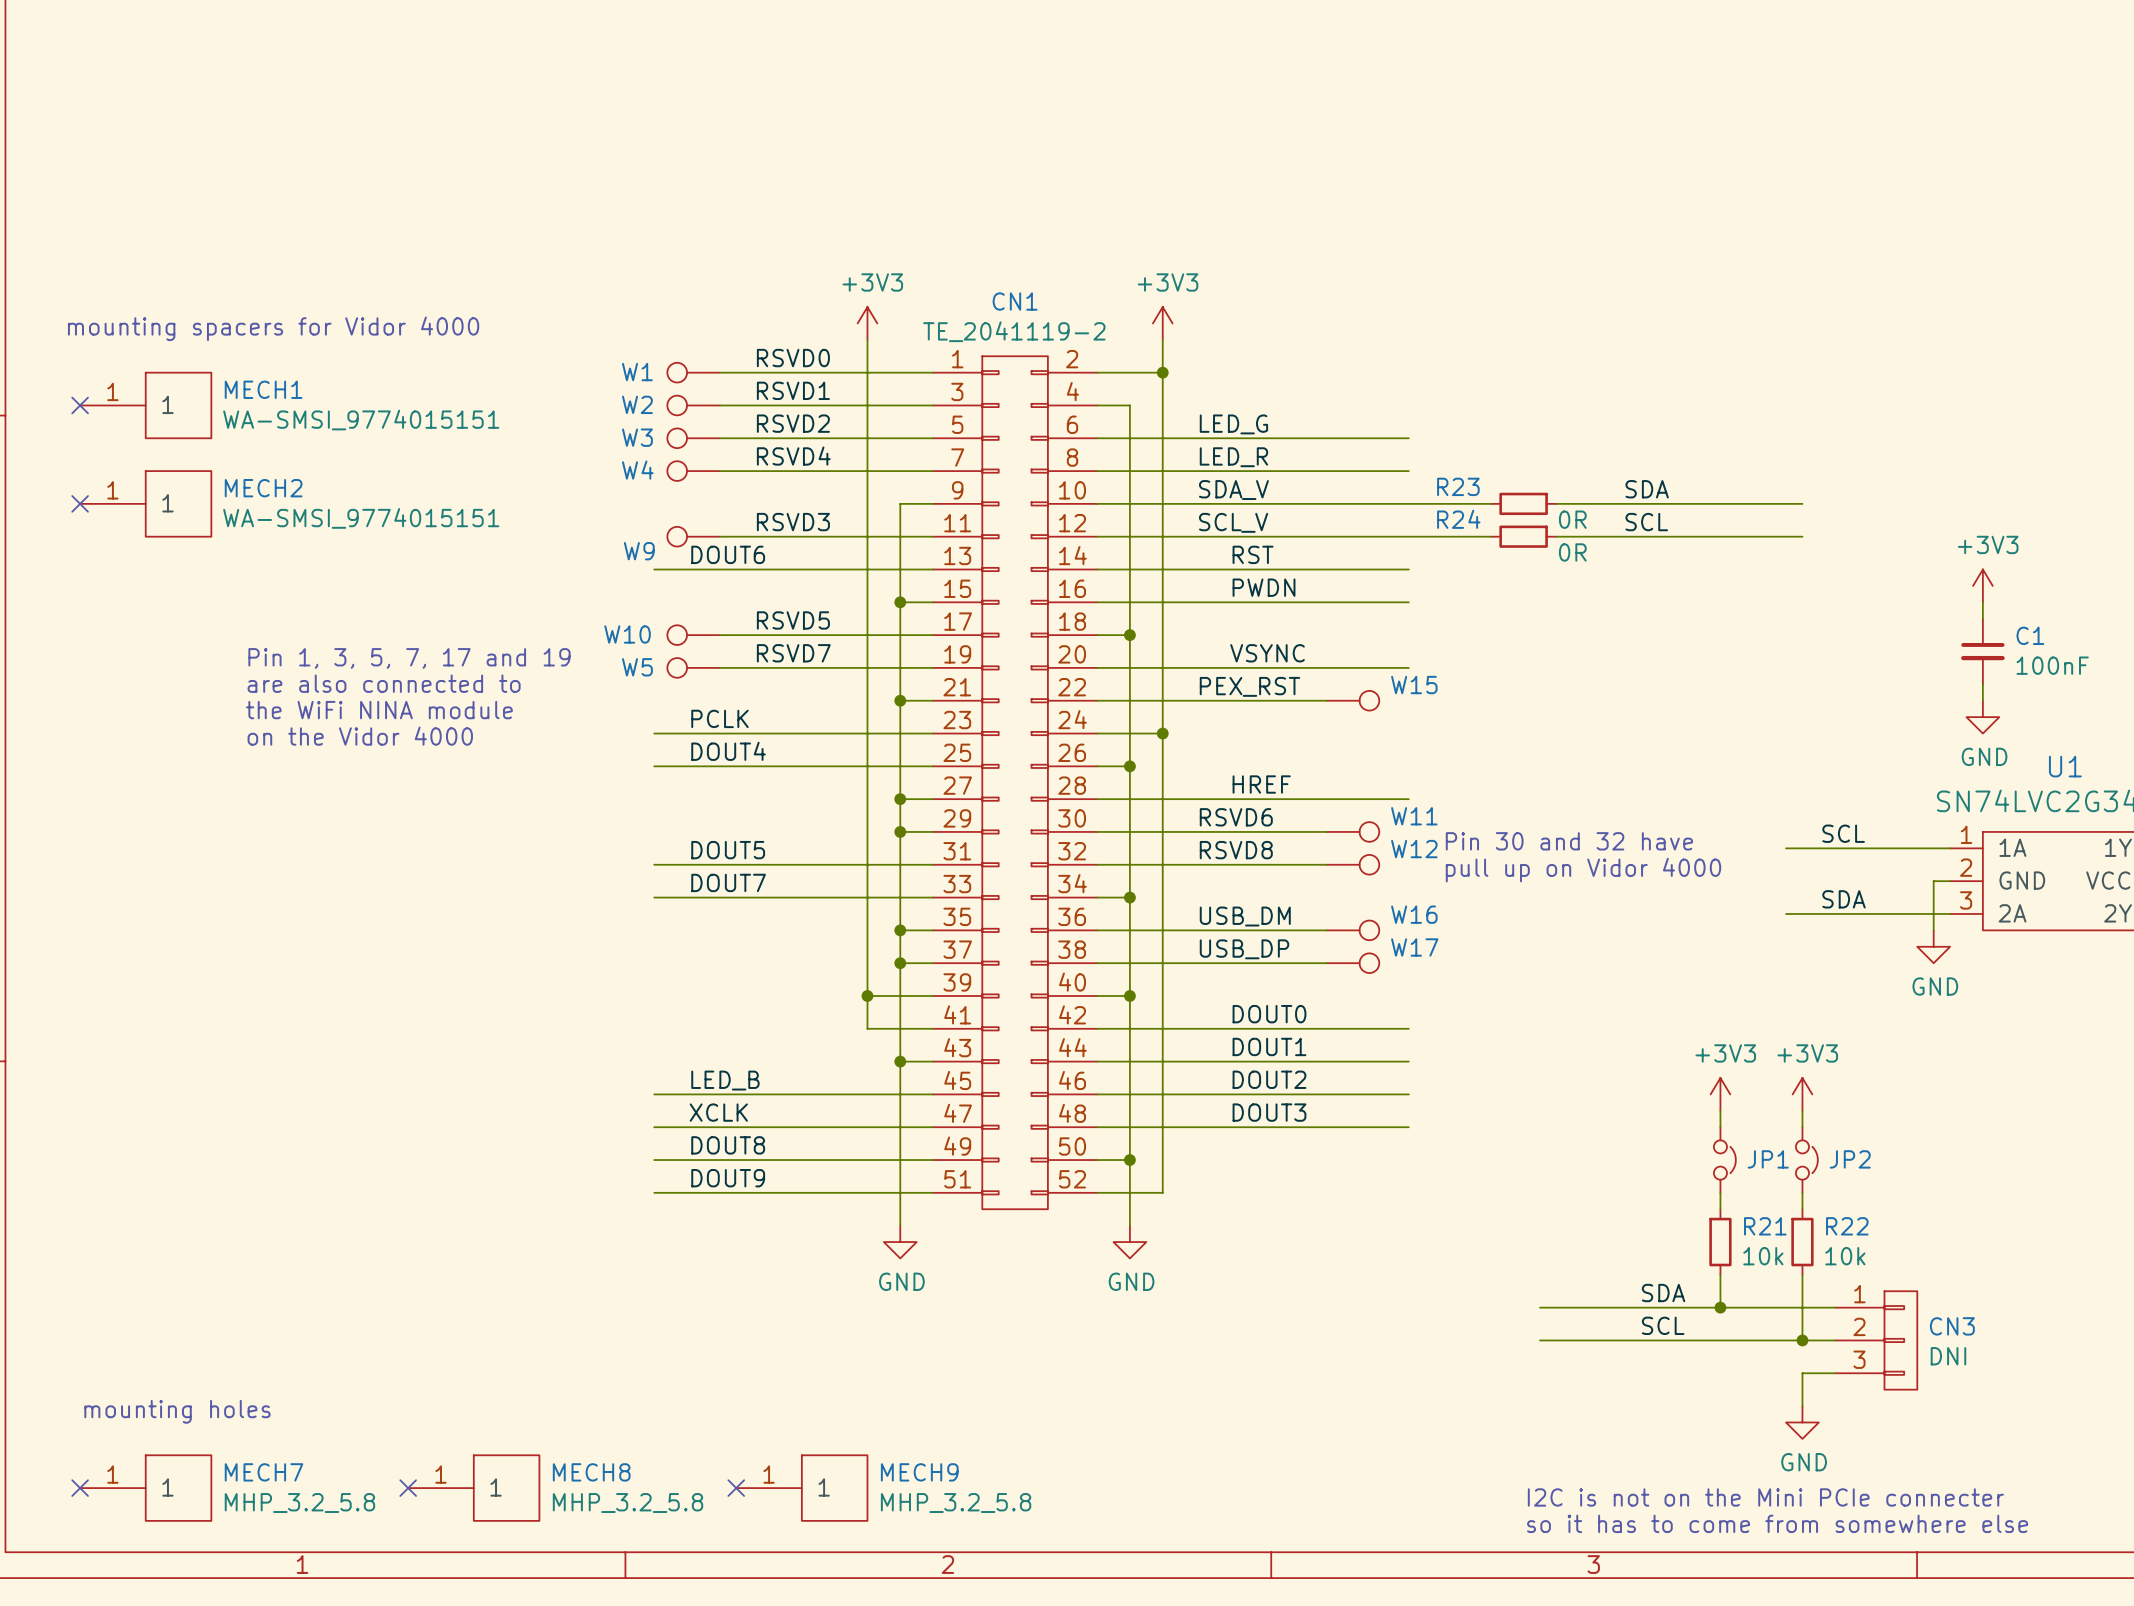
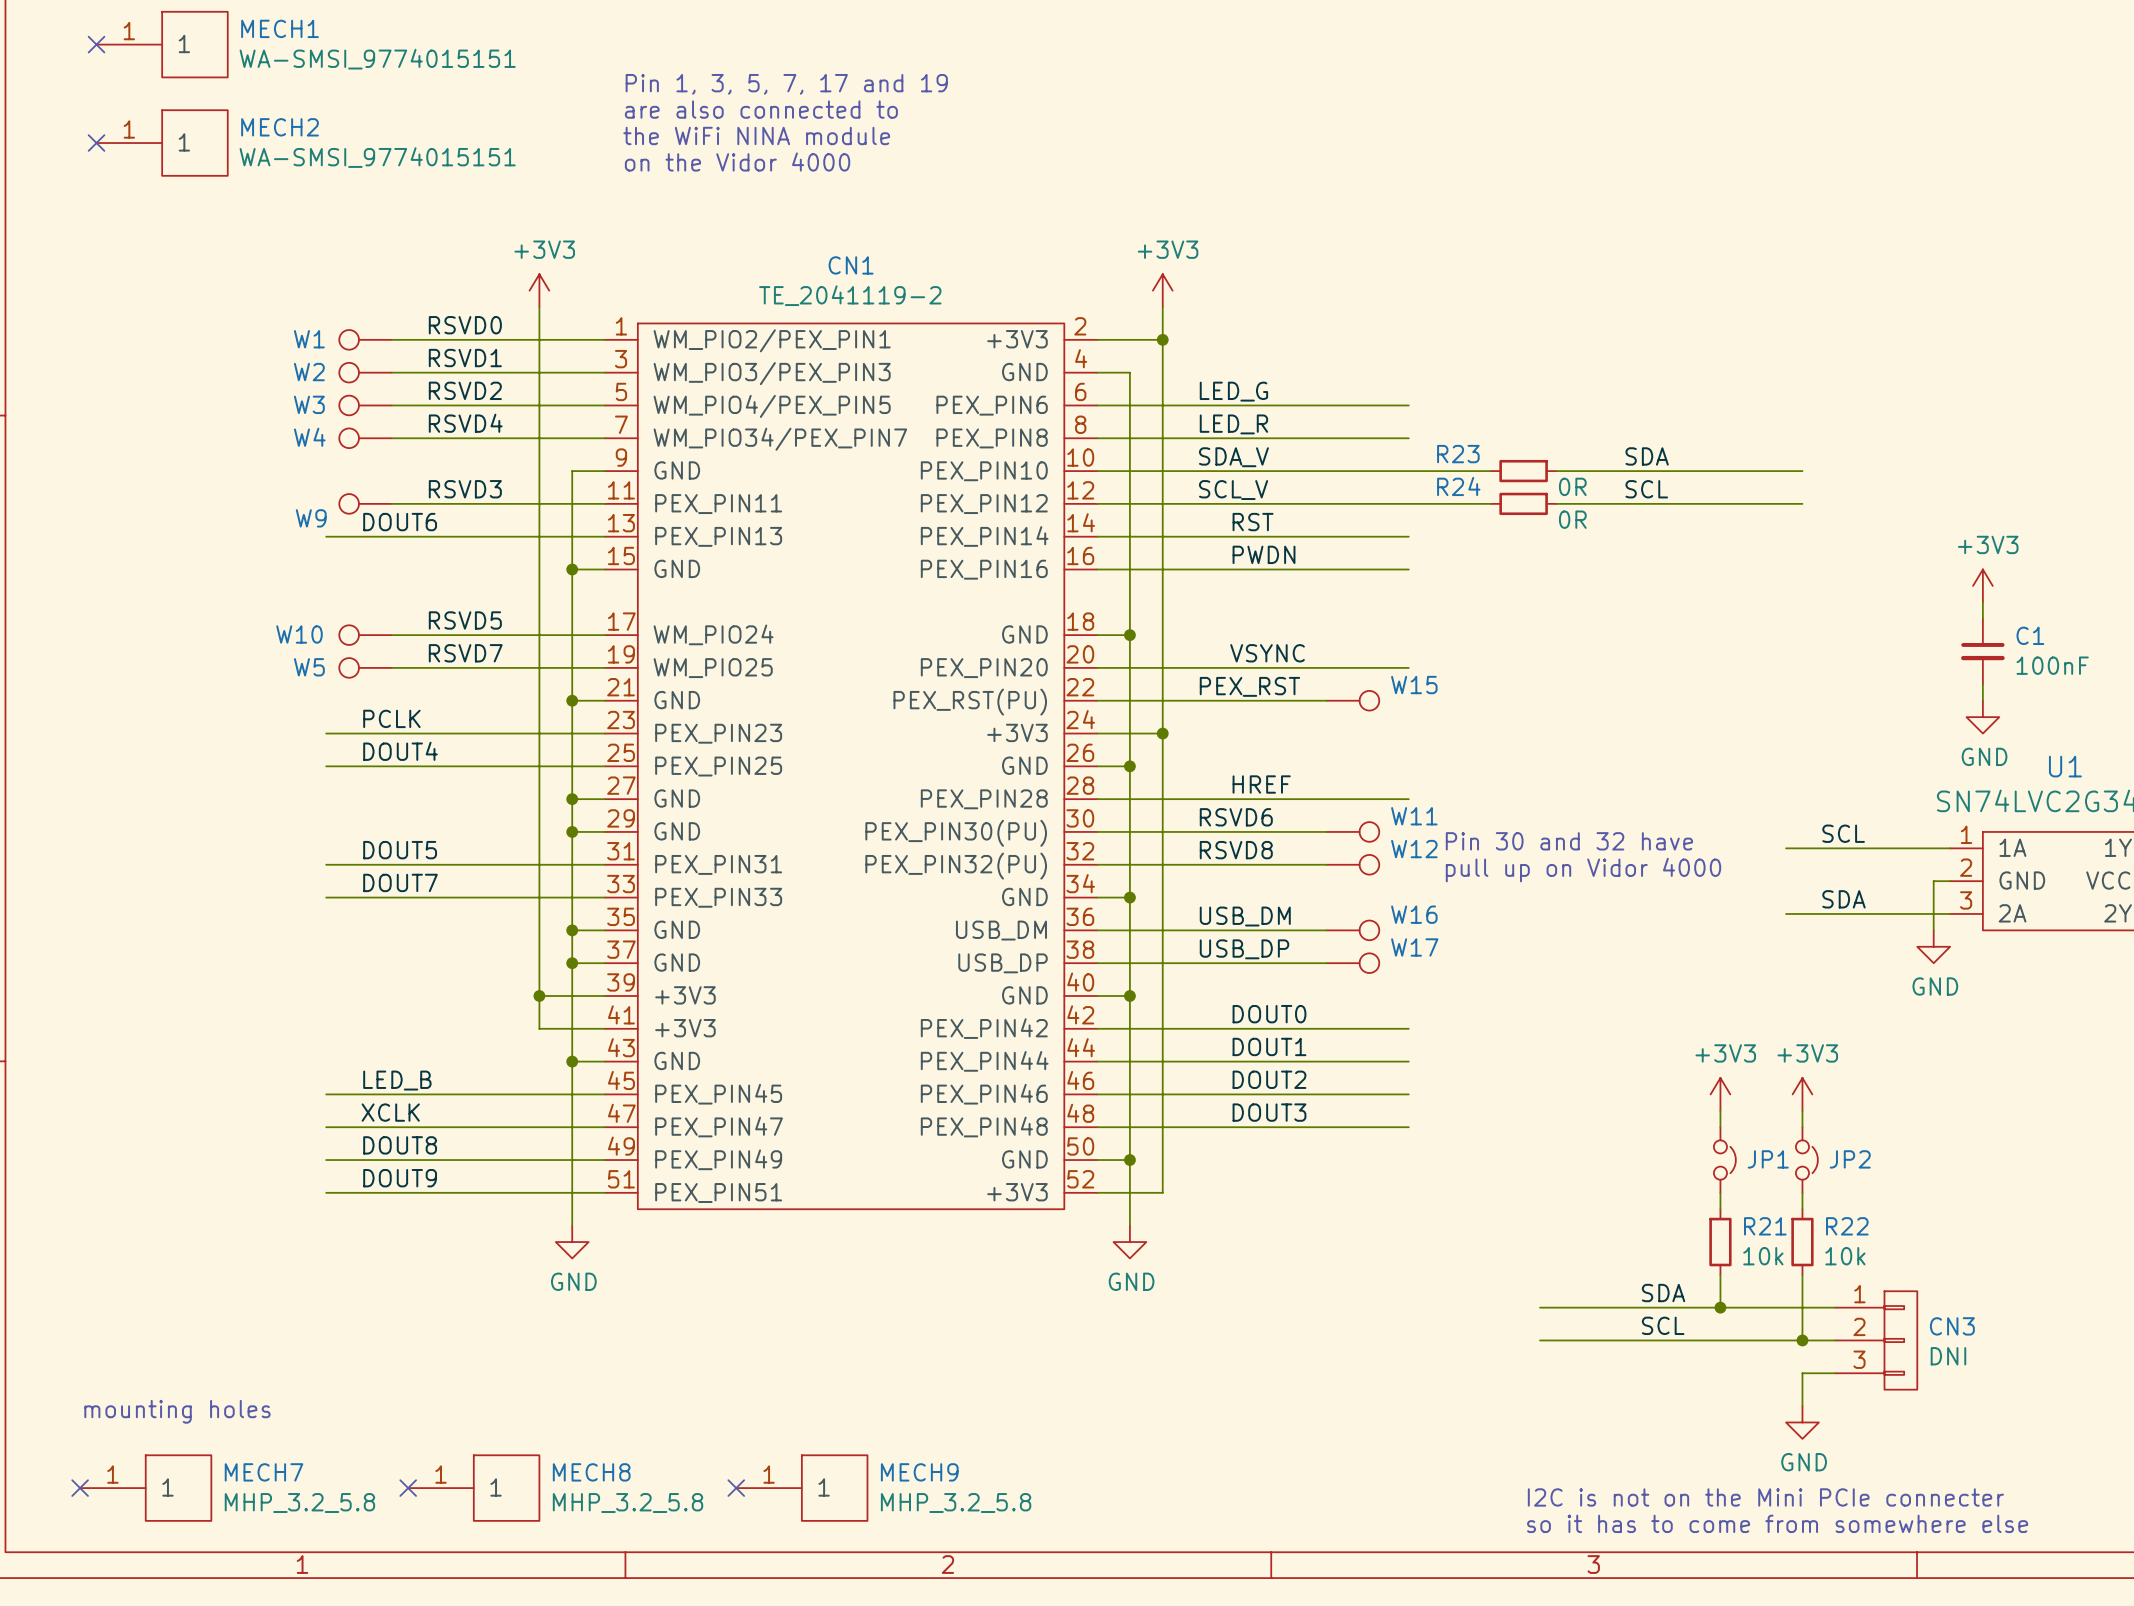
no-connect mark: none -> (96, 44)
text: none -> Pin 1, 3, 5, 7, 17 and 19 (786, 84)
text: none -> are also connected to (761, 109)
text: none -> the WiFi NINA module (756, 135)
no-connect mark: none -> (96, 143)
text: none -> on the Vidor 4000 (737, 162)
power symbol: none -> +3V3 (539, 290)
wire: none -> (539, 307) (539, 1028) (605, 1028)
wire: none -> (1162, 307) (1162, 339) (1097, 339)
power symbol: +3V3 (867, 323) -> none
power symbol position: +3V3 (1162, 323) -> +3V3 (1162, 290)
label: none -> RSVD0 (465, 325)
text: mounting spacers for Vidor 4000 (273, 328) -> none
wire: none -> (391, 339) (605, 339)
wire: (867, 339) (867, 1028) (933, 1028) -> none
CN1 symbol: [933, 356, 1098, 1210] -> [605, 323, 1098, 1210]
label: none -> RSVD1 (465, 358)
label: RSVD0 (793, 358) -> none
wire: none -> (391, 372) (605, 372)
W1 position: (693, 372) -> (365, 339)
wire: (719, 372) (933, 372) -> none
wire: (1129, 372) (1162, 372) -> (1129, 372) (1129, 405) (1408, 405)
junction position: (1162, 372) -> (1162, 339)
label: none -> RSVD2 (465, 390)
label: RSVD1 (793, 390) -> none
label: none -> LED_G (1233, 391)
no-connect mark: (80, 405) -> none
MECH1 position: (145, 405) -> (162, 44)
wire: none -> (391, 405) (605, 405)
W2 position: (693, 405) -> (365, 372)
wire: (719, 405) (933, 405) -> none
label: none -> RSVD4 (465, 423)
label: RSVD2 (793, 423) -> none
label: LED_G (1233, 424) -> LED_R (1233, 424)
wire: none -> (391, 438) (605, 438)
W3 position: (693, 438) -> (365, 405)
wire: (719, 438) (933, 438) -> none
label: RSVD4 (793, 456) -> none
label: none -> SDA (1647, 456)
label: LED_R (1233, 457) -> SDA_V (1233, 457)
wire: none -> (605, 471) (572, 471) (572, 1225)
W4 position: (693, 471) -> (365, 438)
wire: (719, 471) (933, 471) -> none
R23: none -> 0R (1523, 471)
R23 name: R23 (1458, 486) -> R24 (1458, 486)
label: none -> RSVD3 (465, 489)
label: SDA (1647, 489) -> SCL (1646, 489)
label: SDA_V (1233, 490) -> SCL_V (1233, 490)
no-connect mark: (80, 503) -> none
MECH2 position: (145, 503) -> (162, 143)
wire: none -> (391, 503) (605, 503)
wire: (933, 503) (900, 503) (900, 1225) -> none
label: none -> DOUT6 (400, 522)
label: RSVD3 (793, 522) -> none
label: SCL_V (1233, 522) -> none
label: none -> RST (1253, 522)
label: SCL (1646, 522) -> none
wire: none -> (326, 536) (605, 536)
W9 position: (693, 536) -> (365, 503)
wire: (719, 536) (933, 536) -> none
wire: (1408, 536) (1490, 536) -> (1408, 471) (1490, 471)
R24: 0R (1523, 536) -> none
wire: (1556, 536) (1802, 536) -> (1556, 471) (1802, 471)
label: DOUT6 (728, 554) -> none
label: RST (1253, 554) -> PWDN (1264, 554)
wire: none -> (572, 569) (605, 569)
junction: none -> (572, 569)
wire: (654, 569) (933, 569) -> none
label: PWDN (1264, 587) -> none
wire: (900, 602) (933, 602) -> none
junction: (900, 602) -> none
wire: (1097, 602) (1408, 602) -> none
label: none -> RSVD5 (465, 620)
label: RSVD5 (793, 620) -> none
wire: none -> (391, 635) (605, 635)
W10 position: (693, 635) -> (365, 635)
wire: (719, 635) (933, 635) -> none
label: none -> RSVD7 (465, 653)
label: RSVD7 (793, 653) -> none
text: Pin 1, 3, 5, 7, 17 and 19 (409, 658) -> none
wire: none -> (391, 667) (605, 667)
W5 position: (693, 667) -> (365, 667)
wire: (719, 667) (933, 667) -> none
text: are also connected to (384, 683) -> none
wire: none -> (572, 700) (605, 700)
junction: none -> (572, 700)
wire: (900, 700) (933, 700) -> none
junction: (900, 700) -> none
text: the WiFi NINA module (379, 710) -> none
label: none -> PCLK (391, 718)
label: PCLK (719, 718) -> none
wire: none -> (326, 733) (605, 733)
wire: (654, 733) (933, 733) -> none
text: on the Vidor 4000 (360, 736) -> none
label: none -> DOUT4 (400, 751)
label: DOUT4 (728, 751) -> none
wire: none -> (326, 766) (605, 766)
wire: (654, 766) (933, 766) -> none
wire: none -> (572, 799) (605, 799)
junction: none -> (572, 799)
wire: (900, 799) (933, 799) -> none
junction: (900, 799) -> none
wire: none -> (572, 831) (605, 831)
junction: none -> (572, 831)
wire: (900, 831) (933, 831) -> none
junction: (900, 831) -> none
label: none -> DOUT5 (400, 850)
label: DOUT5 (728, 850) -> none
wire: none -> (326, 864) (605, 864)
wire: (654, 864) (933, 864) -> none
label: none -> DOUT7 (400, 882)
label: DOUT7 (728, 882) -> none
wire: none -> (326, 897) (605, 897)
wire: (654, 897) (933, 897) -> none
wire: none -> (572, 930) (605, 930)
junction: none -> (572, 930)
wire: (900, 930) (933, 930) -> none
junction: (900, 930) -> none
wire: none -> (572, 963) (605, 963)
junction: none -> (572, 963)
wire: (900, 963) (933, 963) -> none
junction: (900, 963) -> none
wire: none -> (539, 995) (605, 995)
junction: none -> (539, 995)
wire: (867, 995) (933, 995) -> none
junction: (867, 995) -> none
wire: none -> (572, 1061) (605, 1061)
junction: none -> (572, 1061)
wire: (900, 1061) (933, 1061) -> none
junction: (900, 1061) -> none
label: none -> LED_B (397, 1080)
label: LED_B (725, 1080) -> none
wire: none -> (326, 1094) (605, 1094)
wire: (654, 1094) (933, 1094) -> none
label: none -> XCLK (390, 1112)
label: XCLK (718, 1112) -> none
wire: none -> (326, 1127) (605, 1127)
wire: (654, 1127) (933, 1127) -> none
label: none -> DOUT8 (400, 1145)
label: DOUT8 (728, 1145) -> none
wire: none -> (326, 1160) (605, 1160)
wire: (654, 1160) (933, 1160) -> none
label: none -> DOUT9 (400, 1178)
label: DOUT9 (728, 1178) -> none
wire: none -> (326, 1192) (605, 1192)
wire: (654, 1192) (933, 1192) -> none
power symbol: none -> GND (572, 1242)
power symbol: GND (900, 1242) -> none

